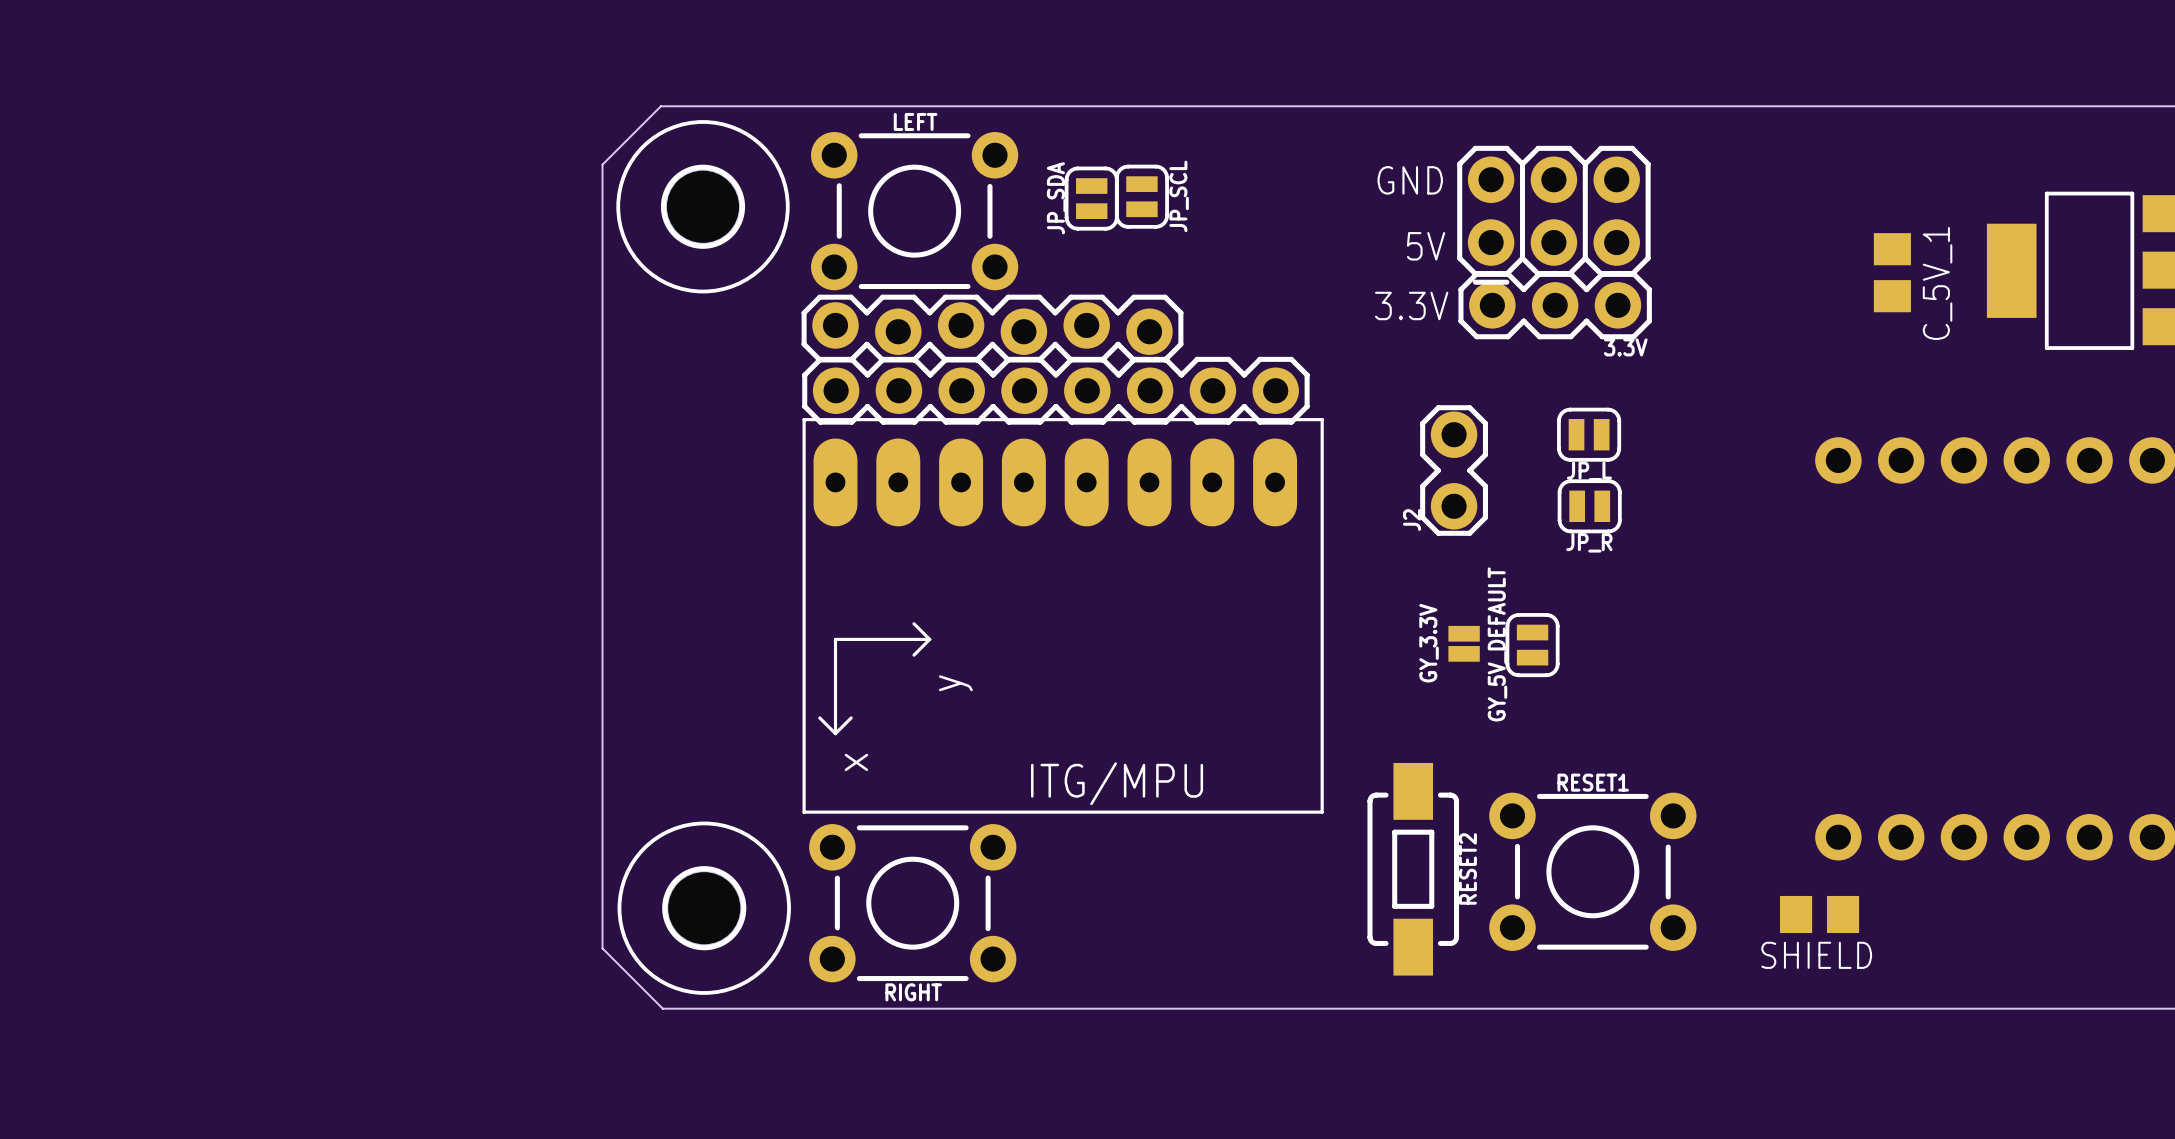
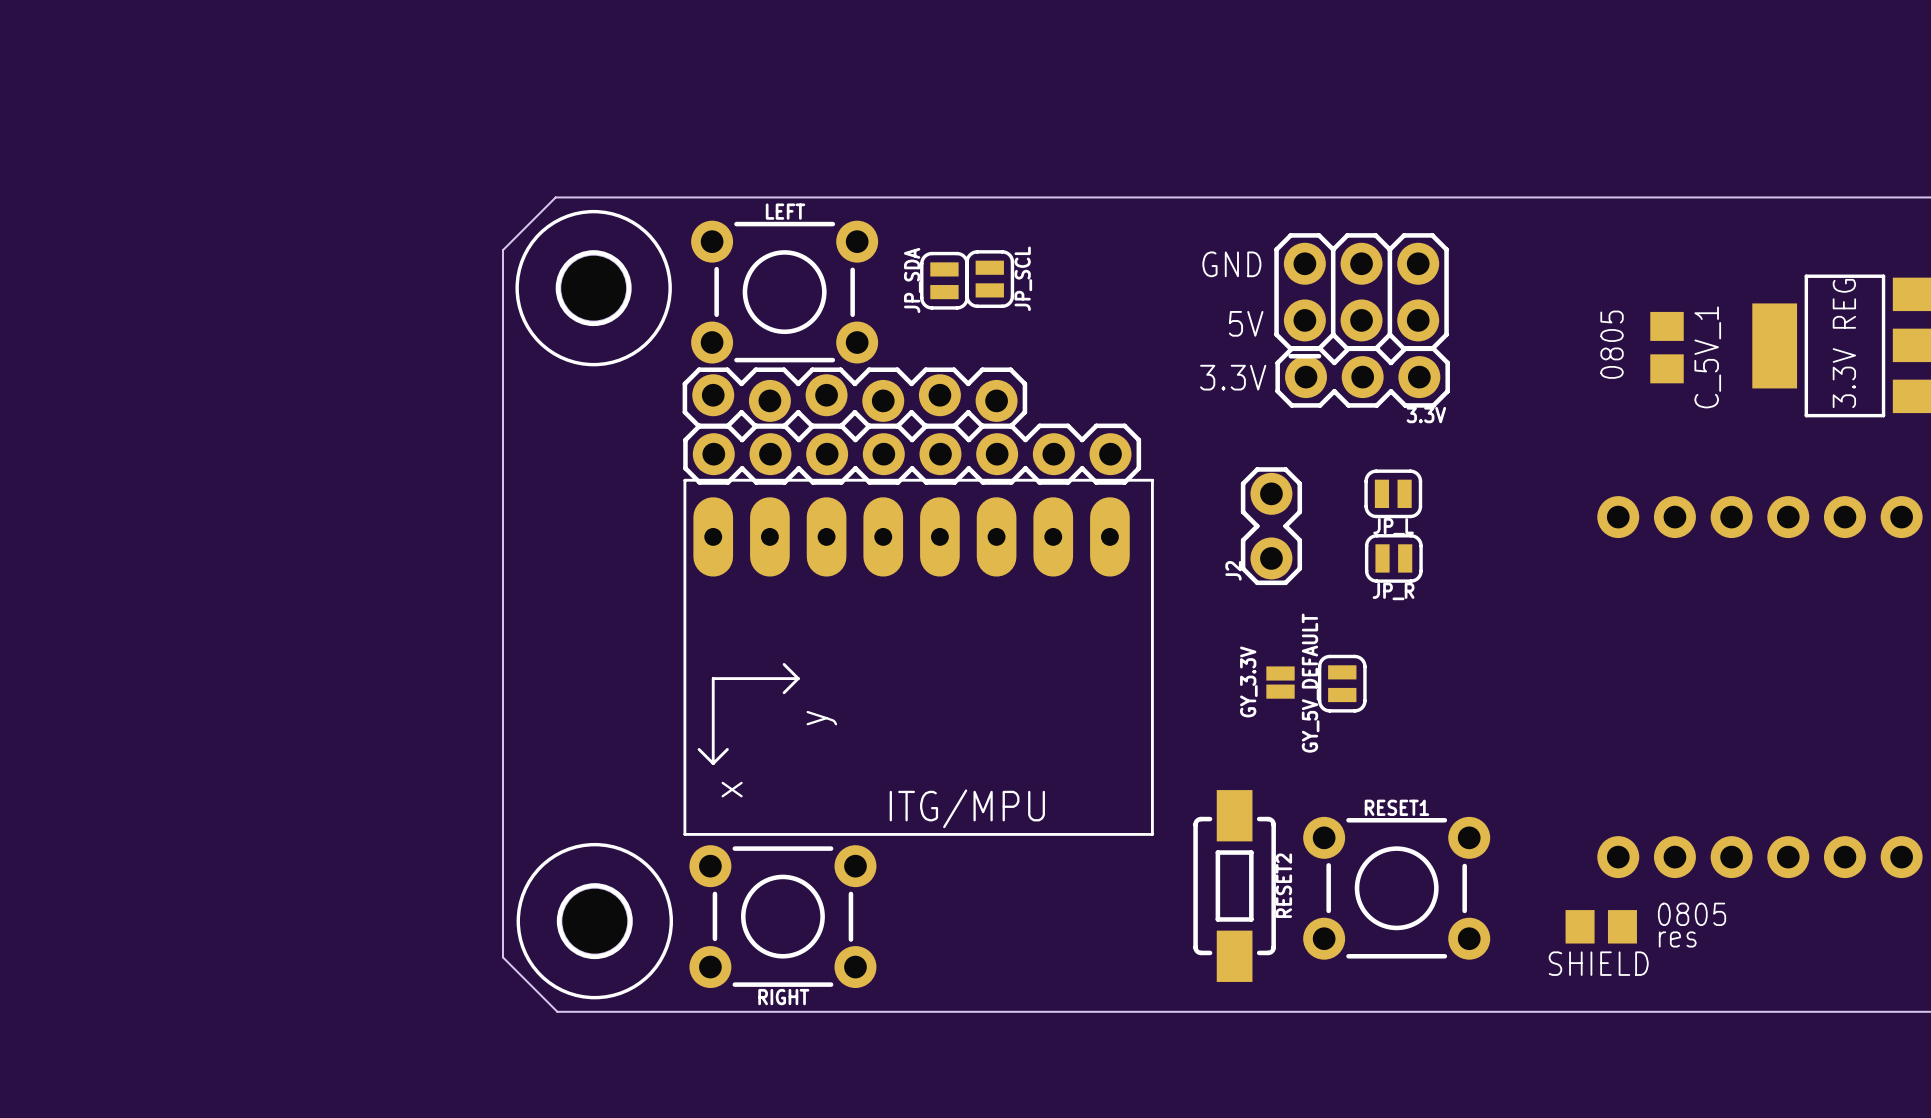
text: none -> 3.3V REG (1844, 343)
text: none -> 0805 (1612, 344)
text: none -> 0805 (1692, 914)
text: none -> res (1677, 939)

